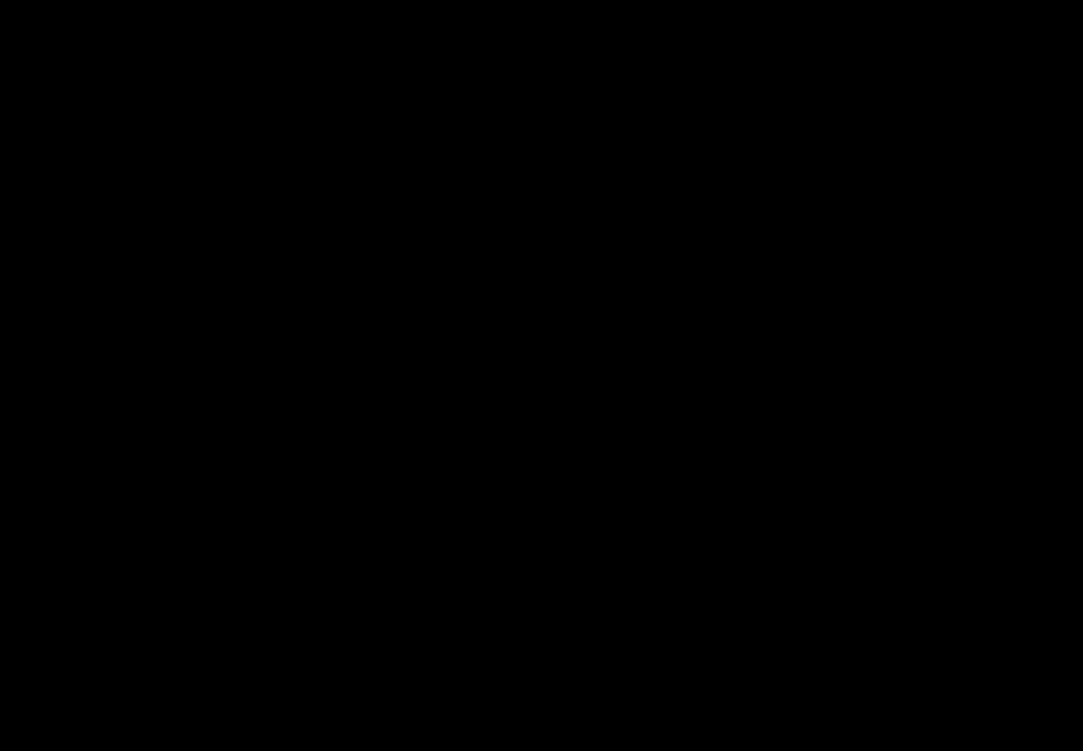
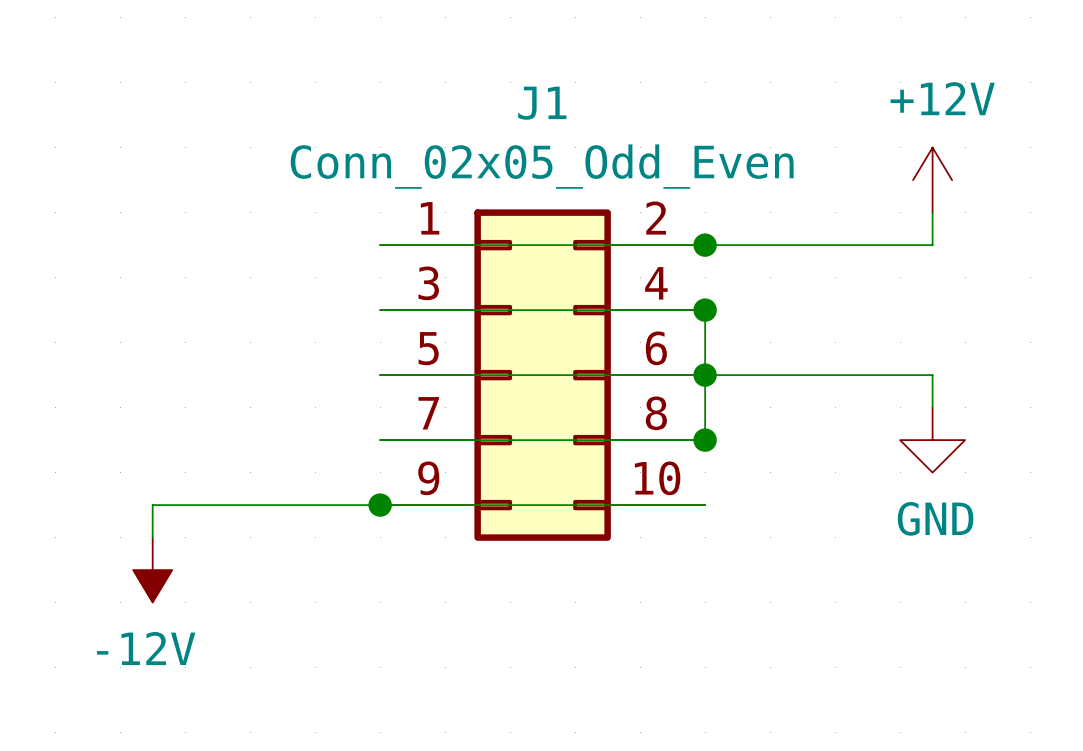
power symbol: none -> +12V (932, 180)
wire: none -> (932, 212) (932, 245) (380, 245)
junction: none -> (705, 245)
wire: none -> (380, 310) (705, 310) (705, 440) (380, 440)
junction: none -> (705, 310)
wire: none -> (380, 375) (932, 375) (932, 407)
J1: none -> Conn_02x05_Odd_Even (542, 375)
junction: none -> (705, 375)
junction: none -> (705, 440)
power symbol: none -> GND (932, 440)
junction: none -> (380, 505)
wire: none -> (705, 505) (152, 505) (152, 537)
power symbol: none -> -12V (152, 570)

